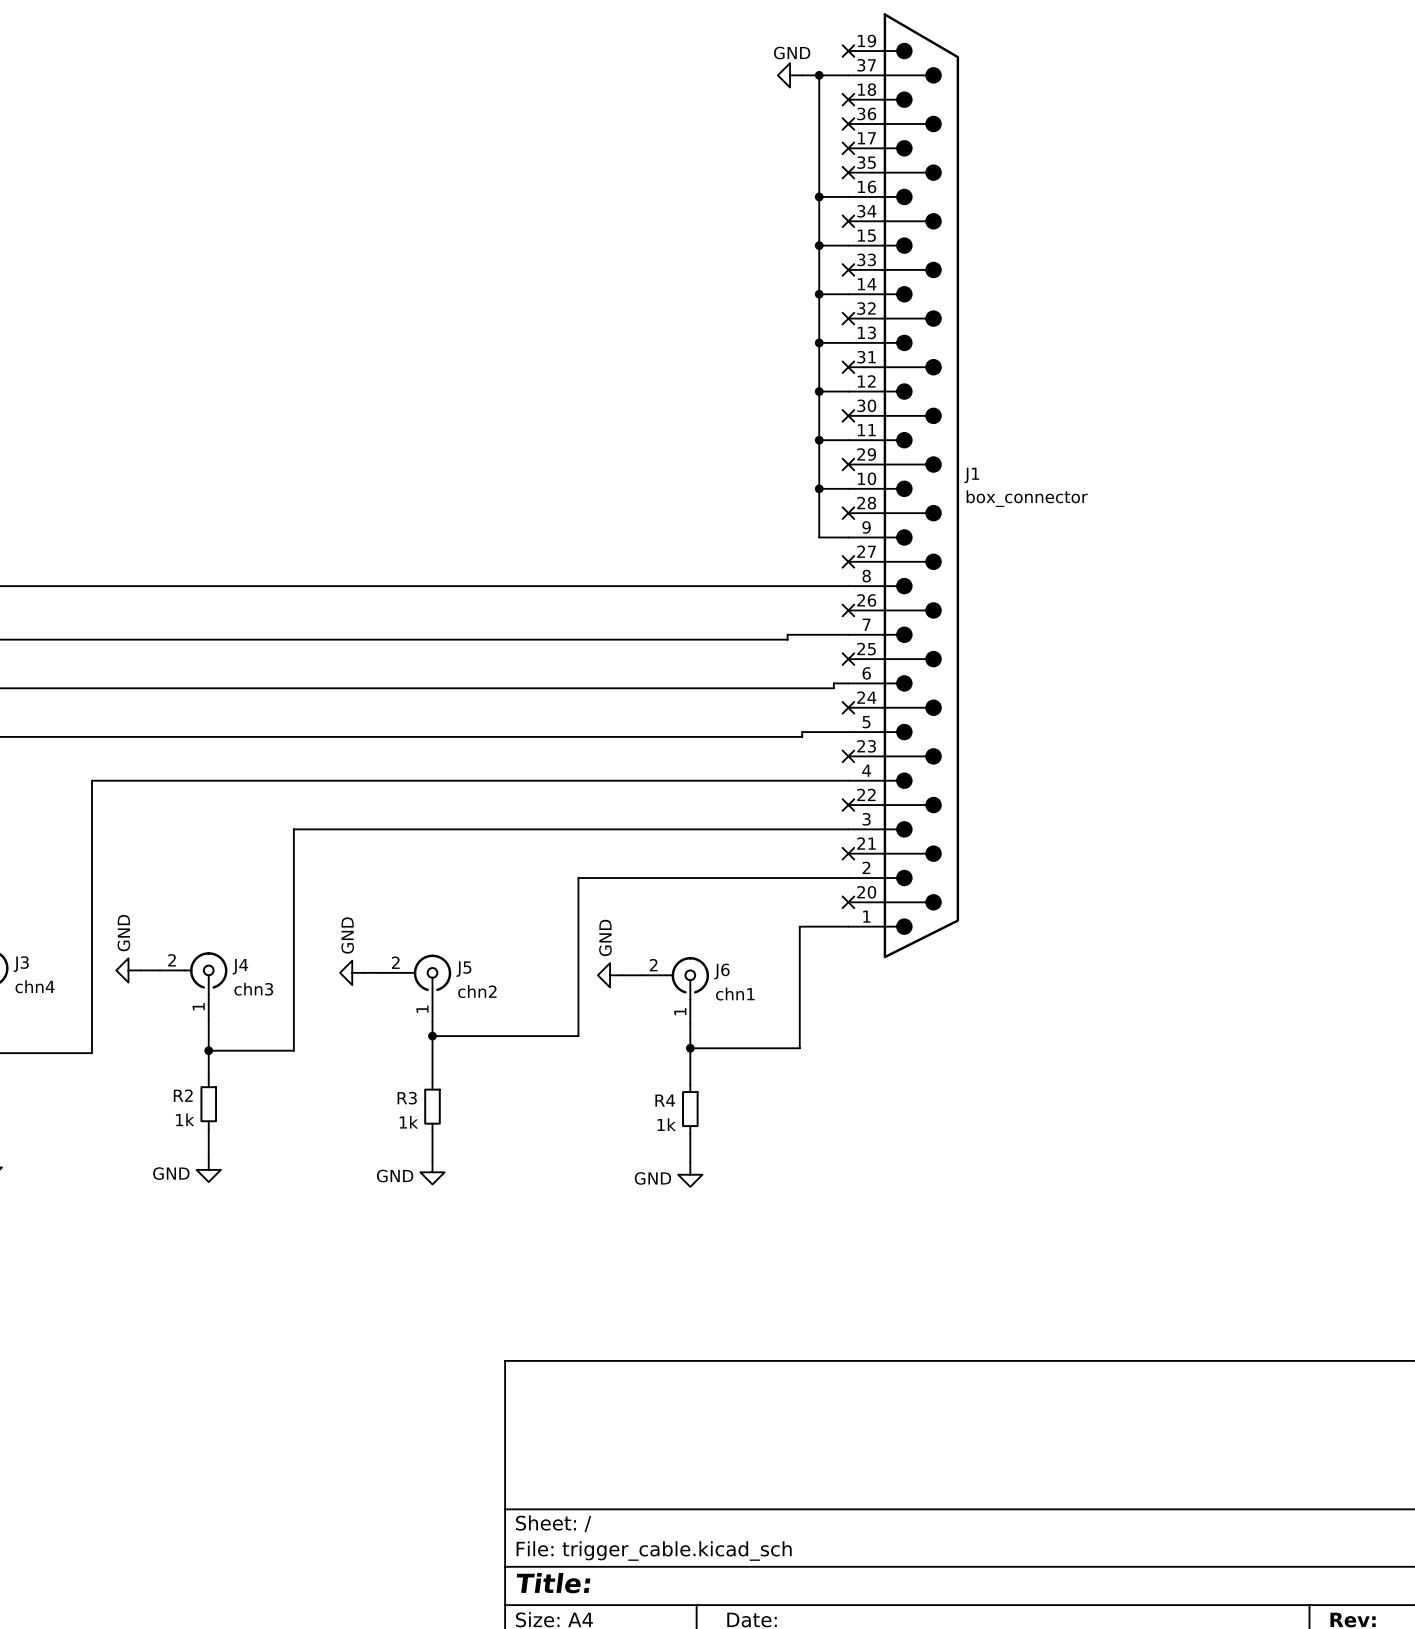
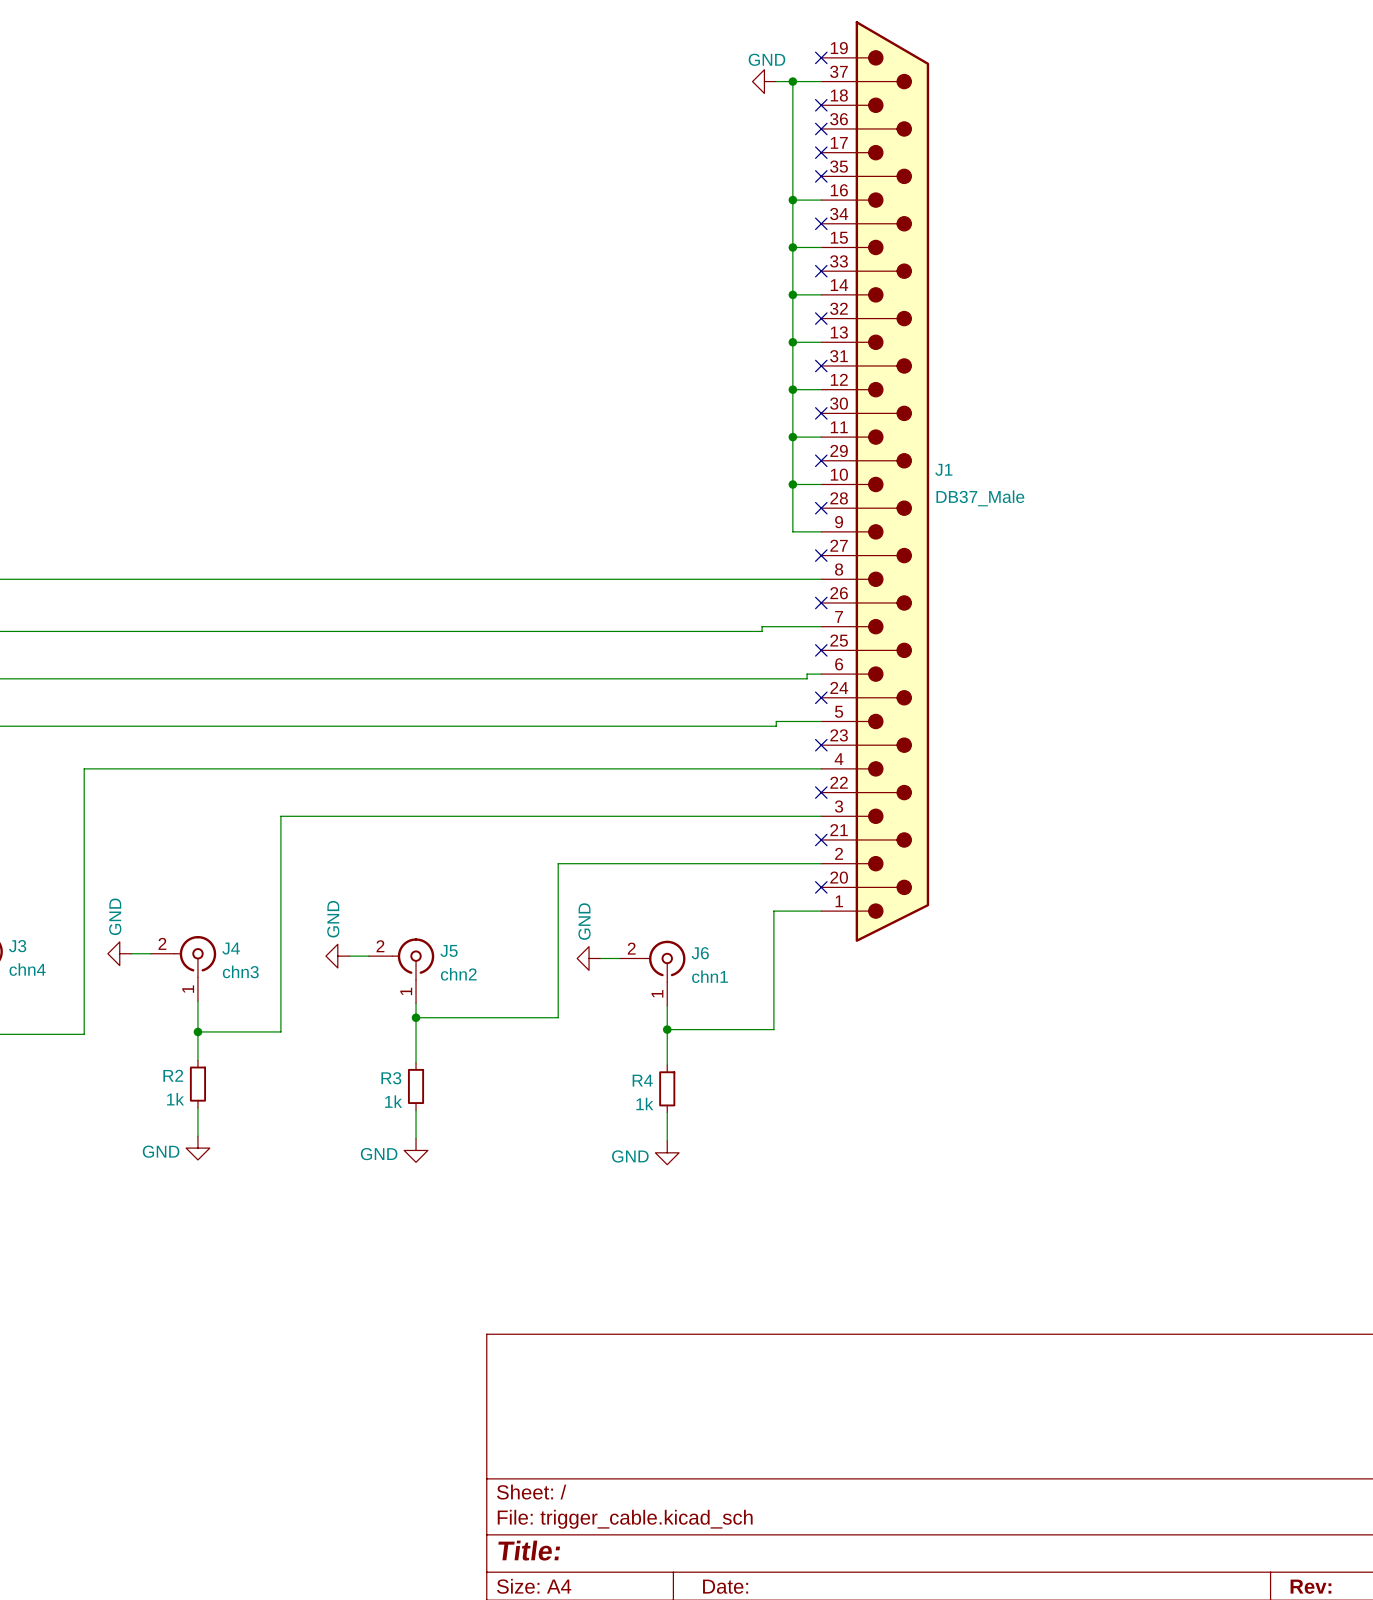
J1 value: box_connector (1027, 498) -> DB37_Male (980, 498)

